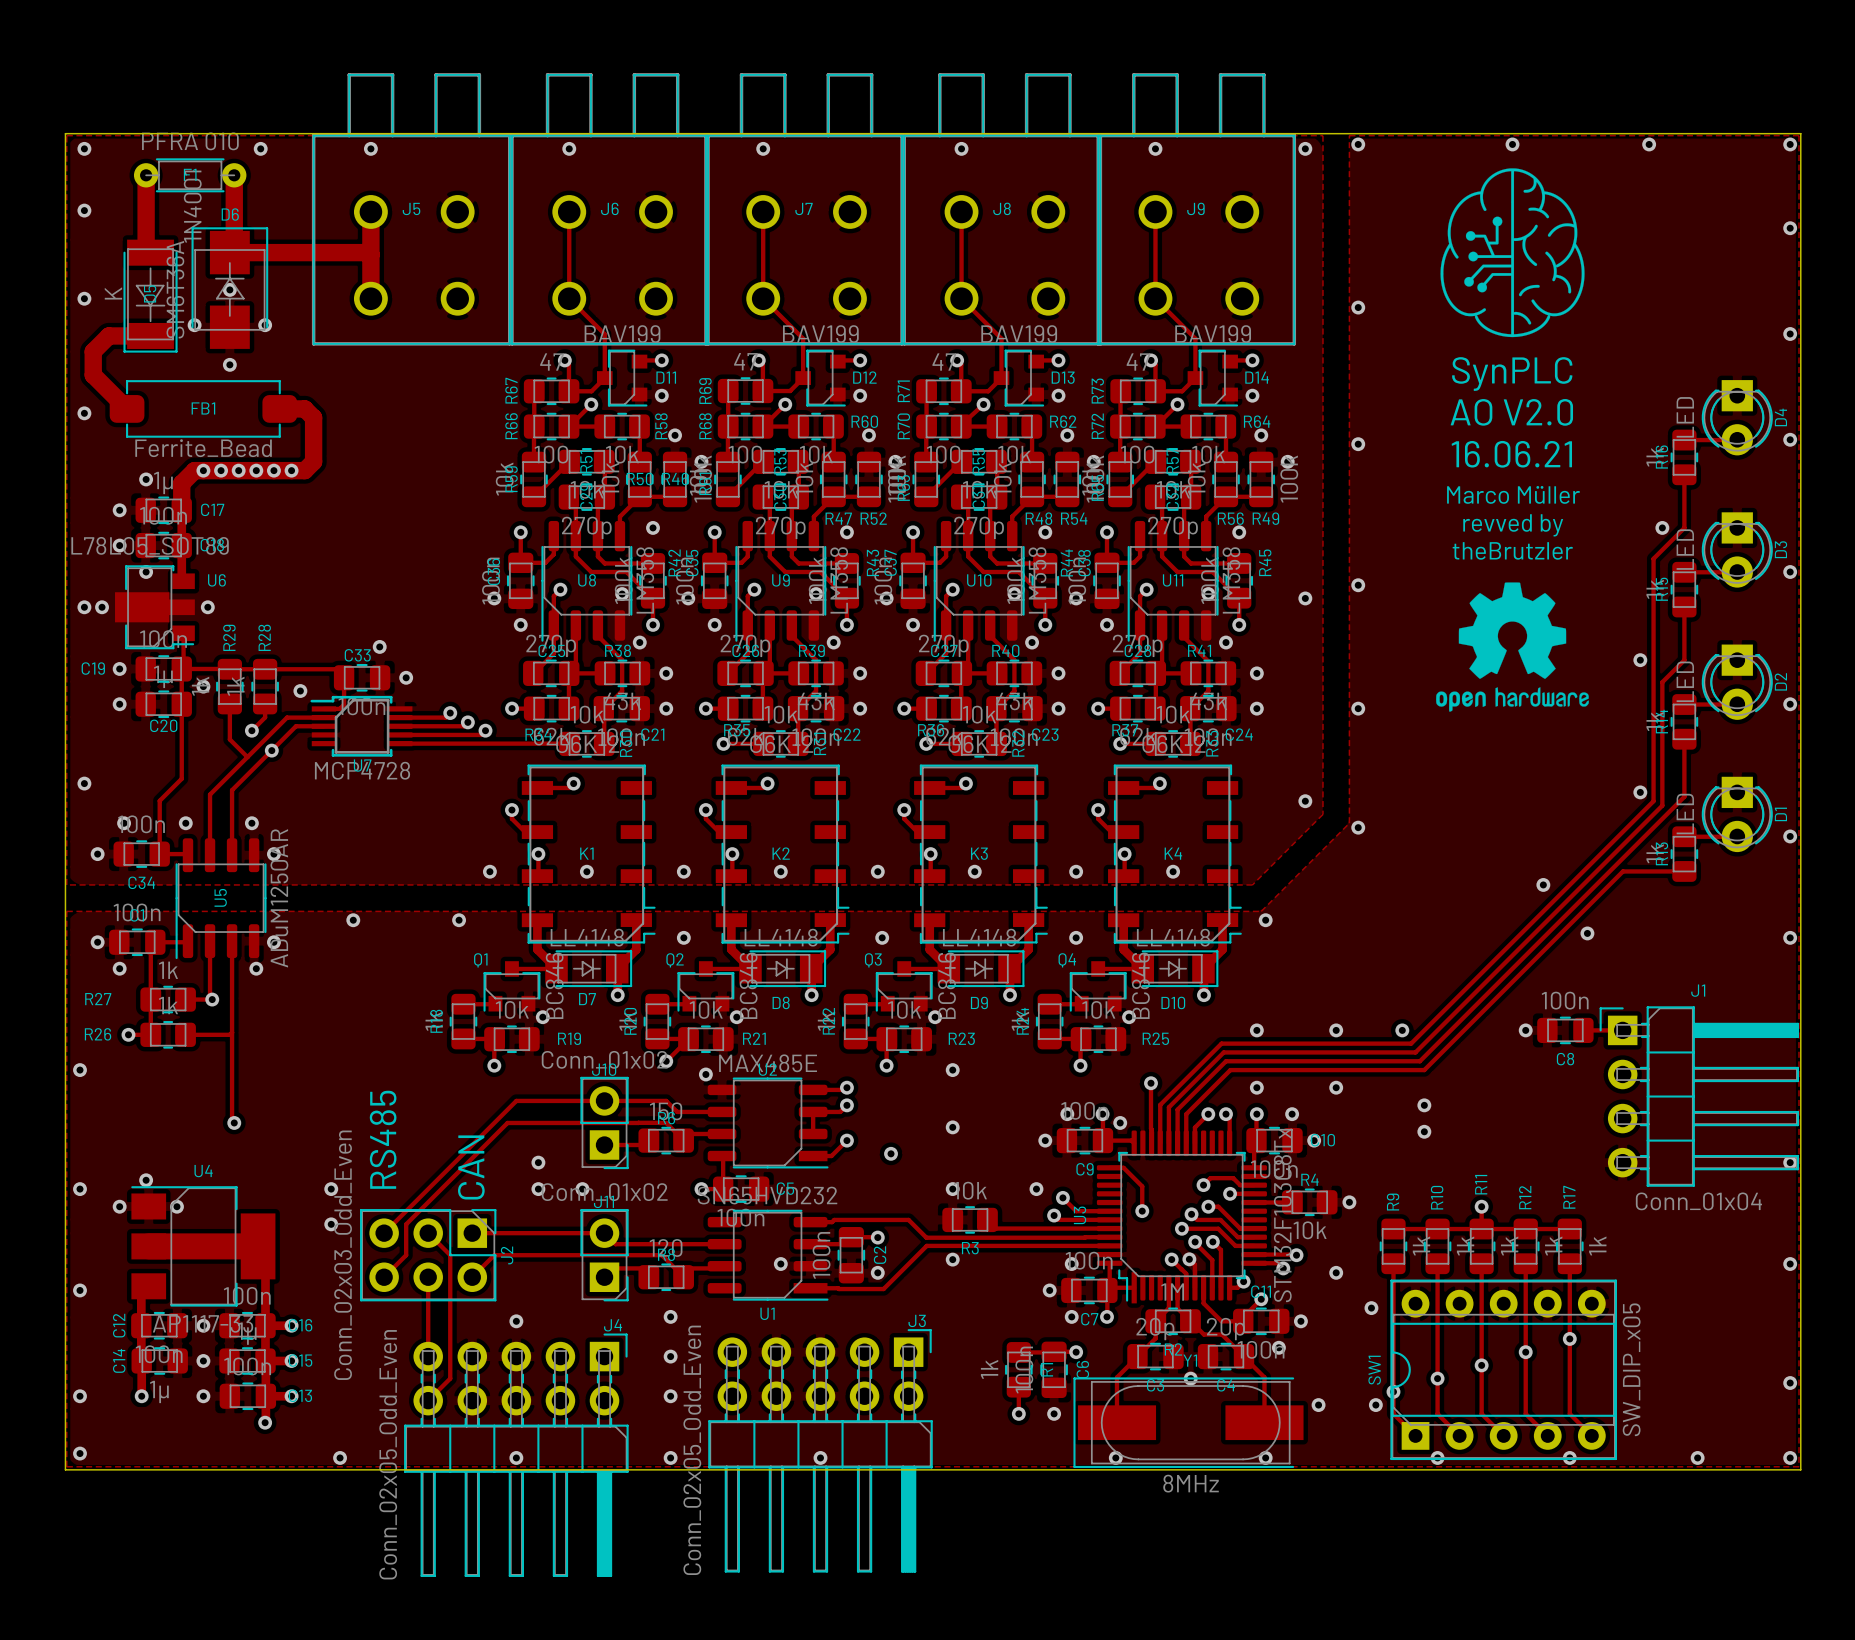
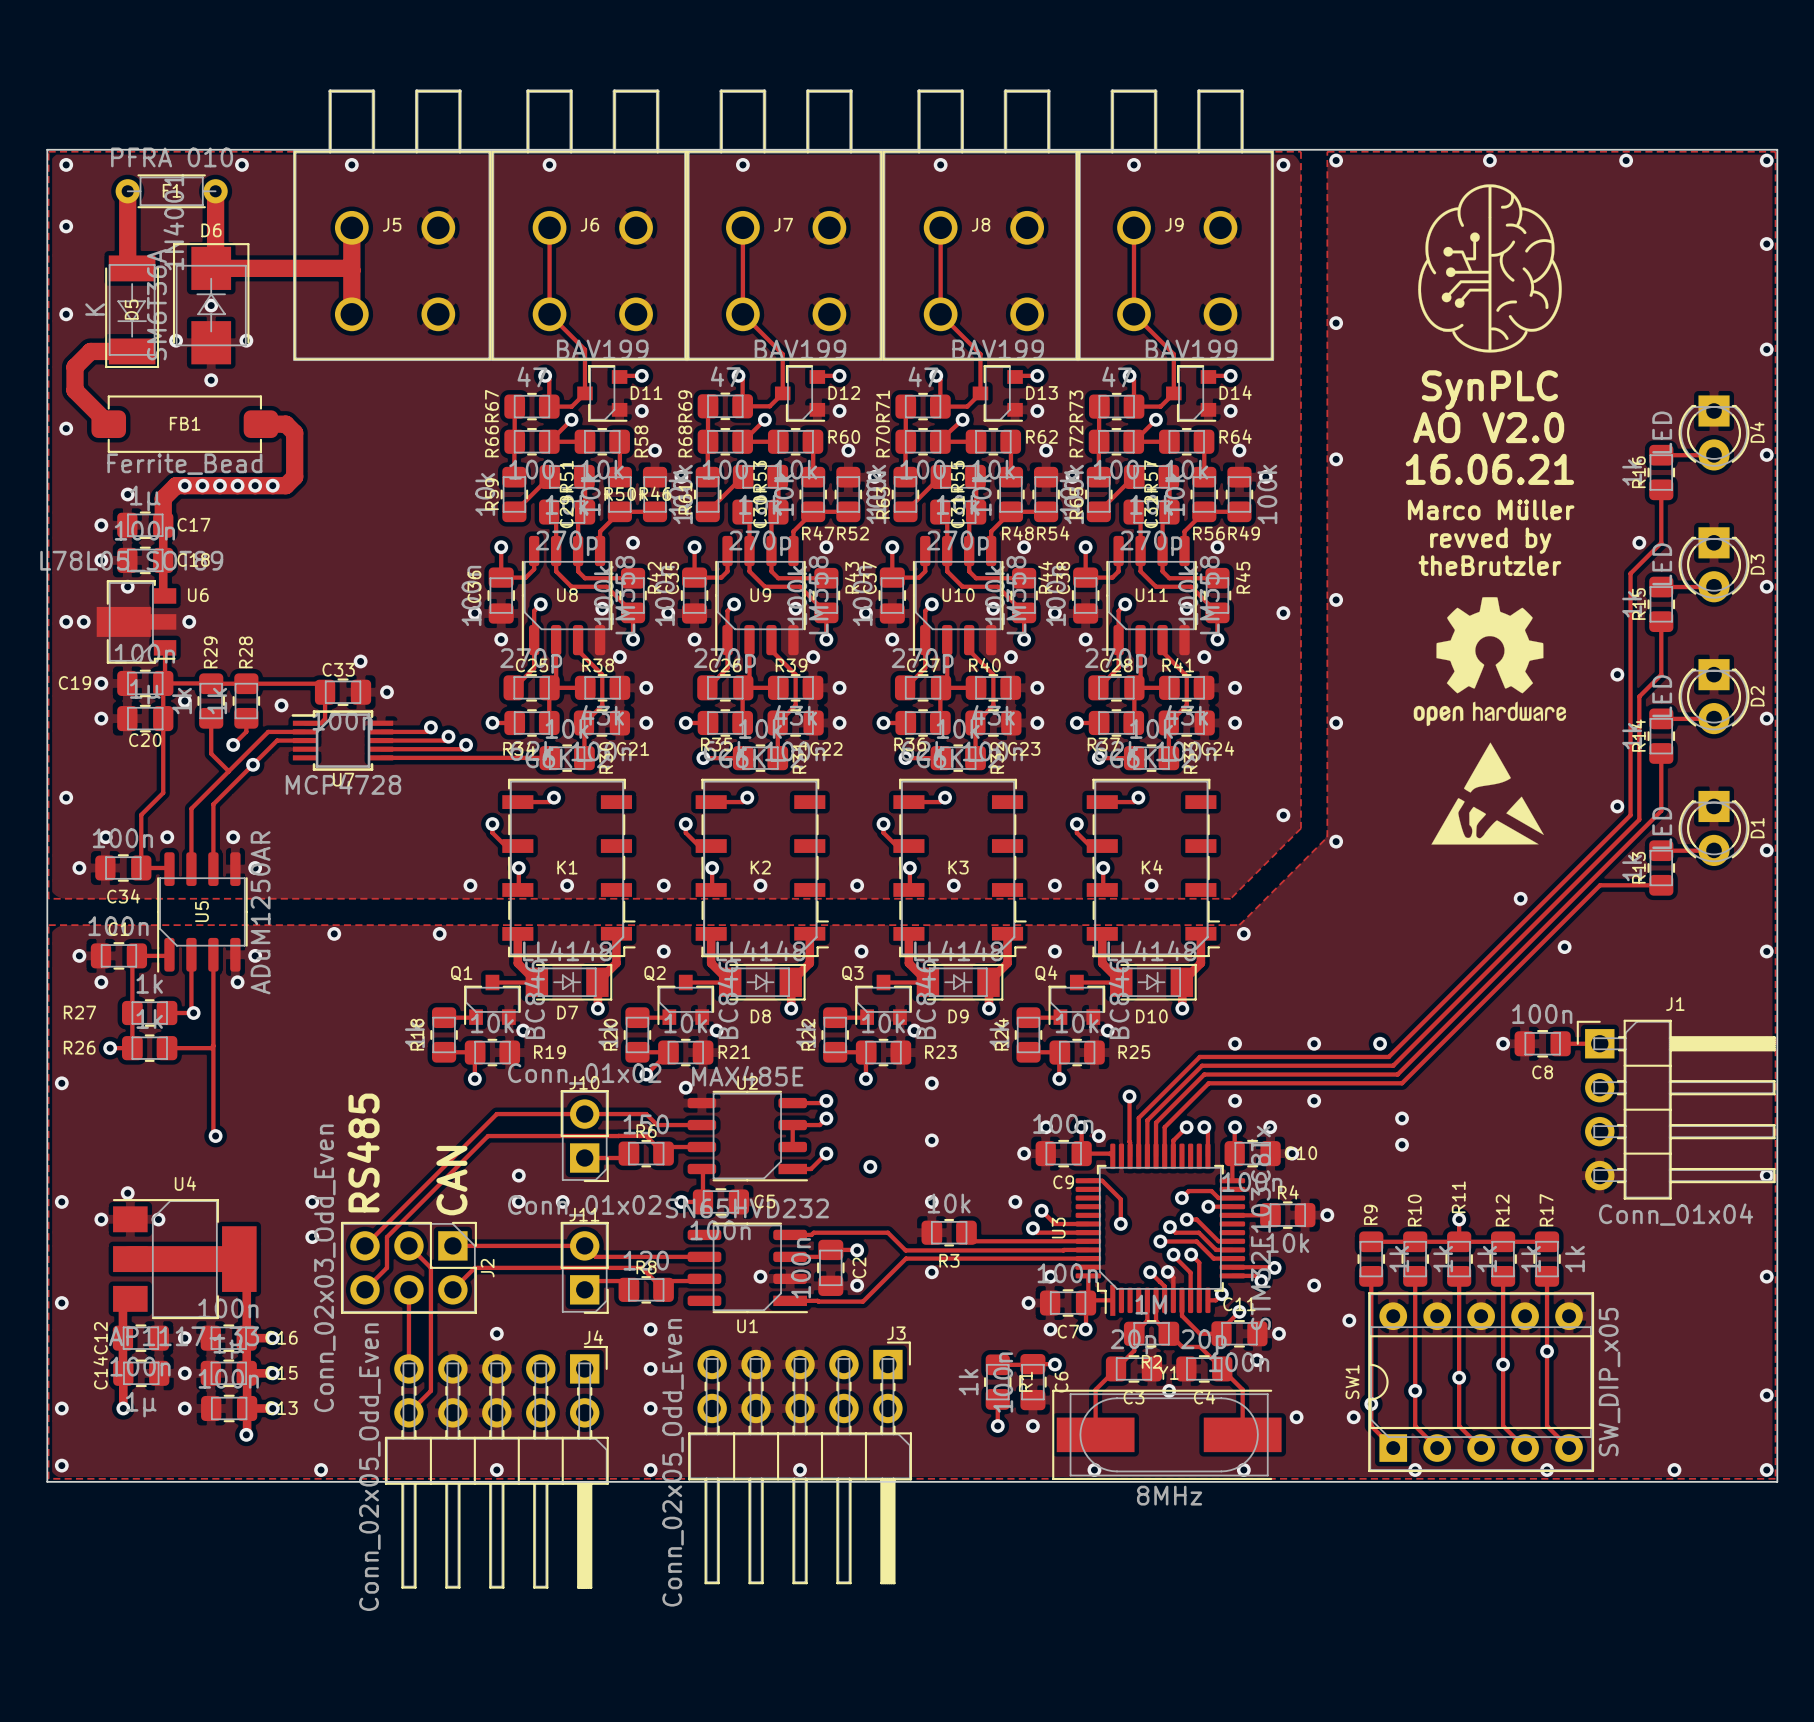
drawing: none -> [1431, 742, 1544, 845]

